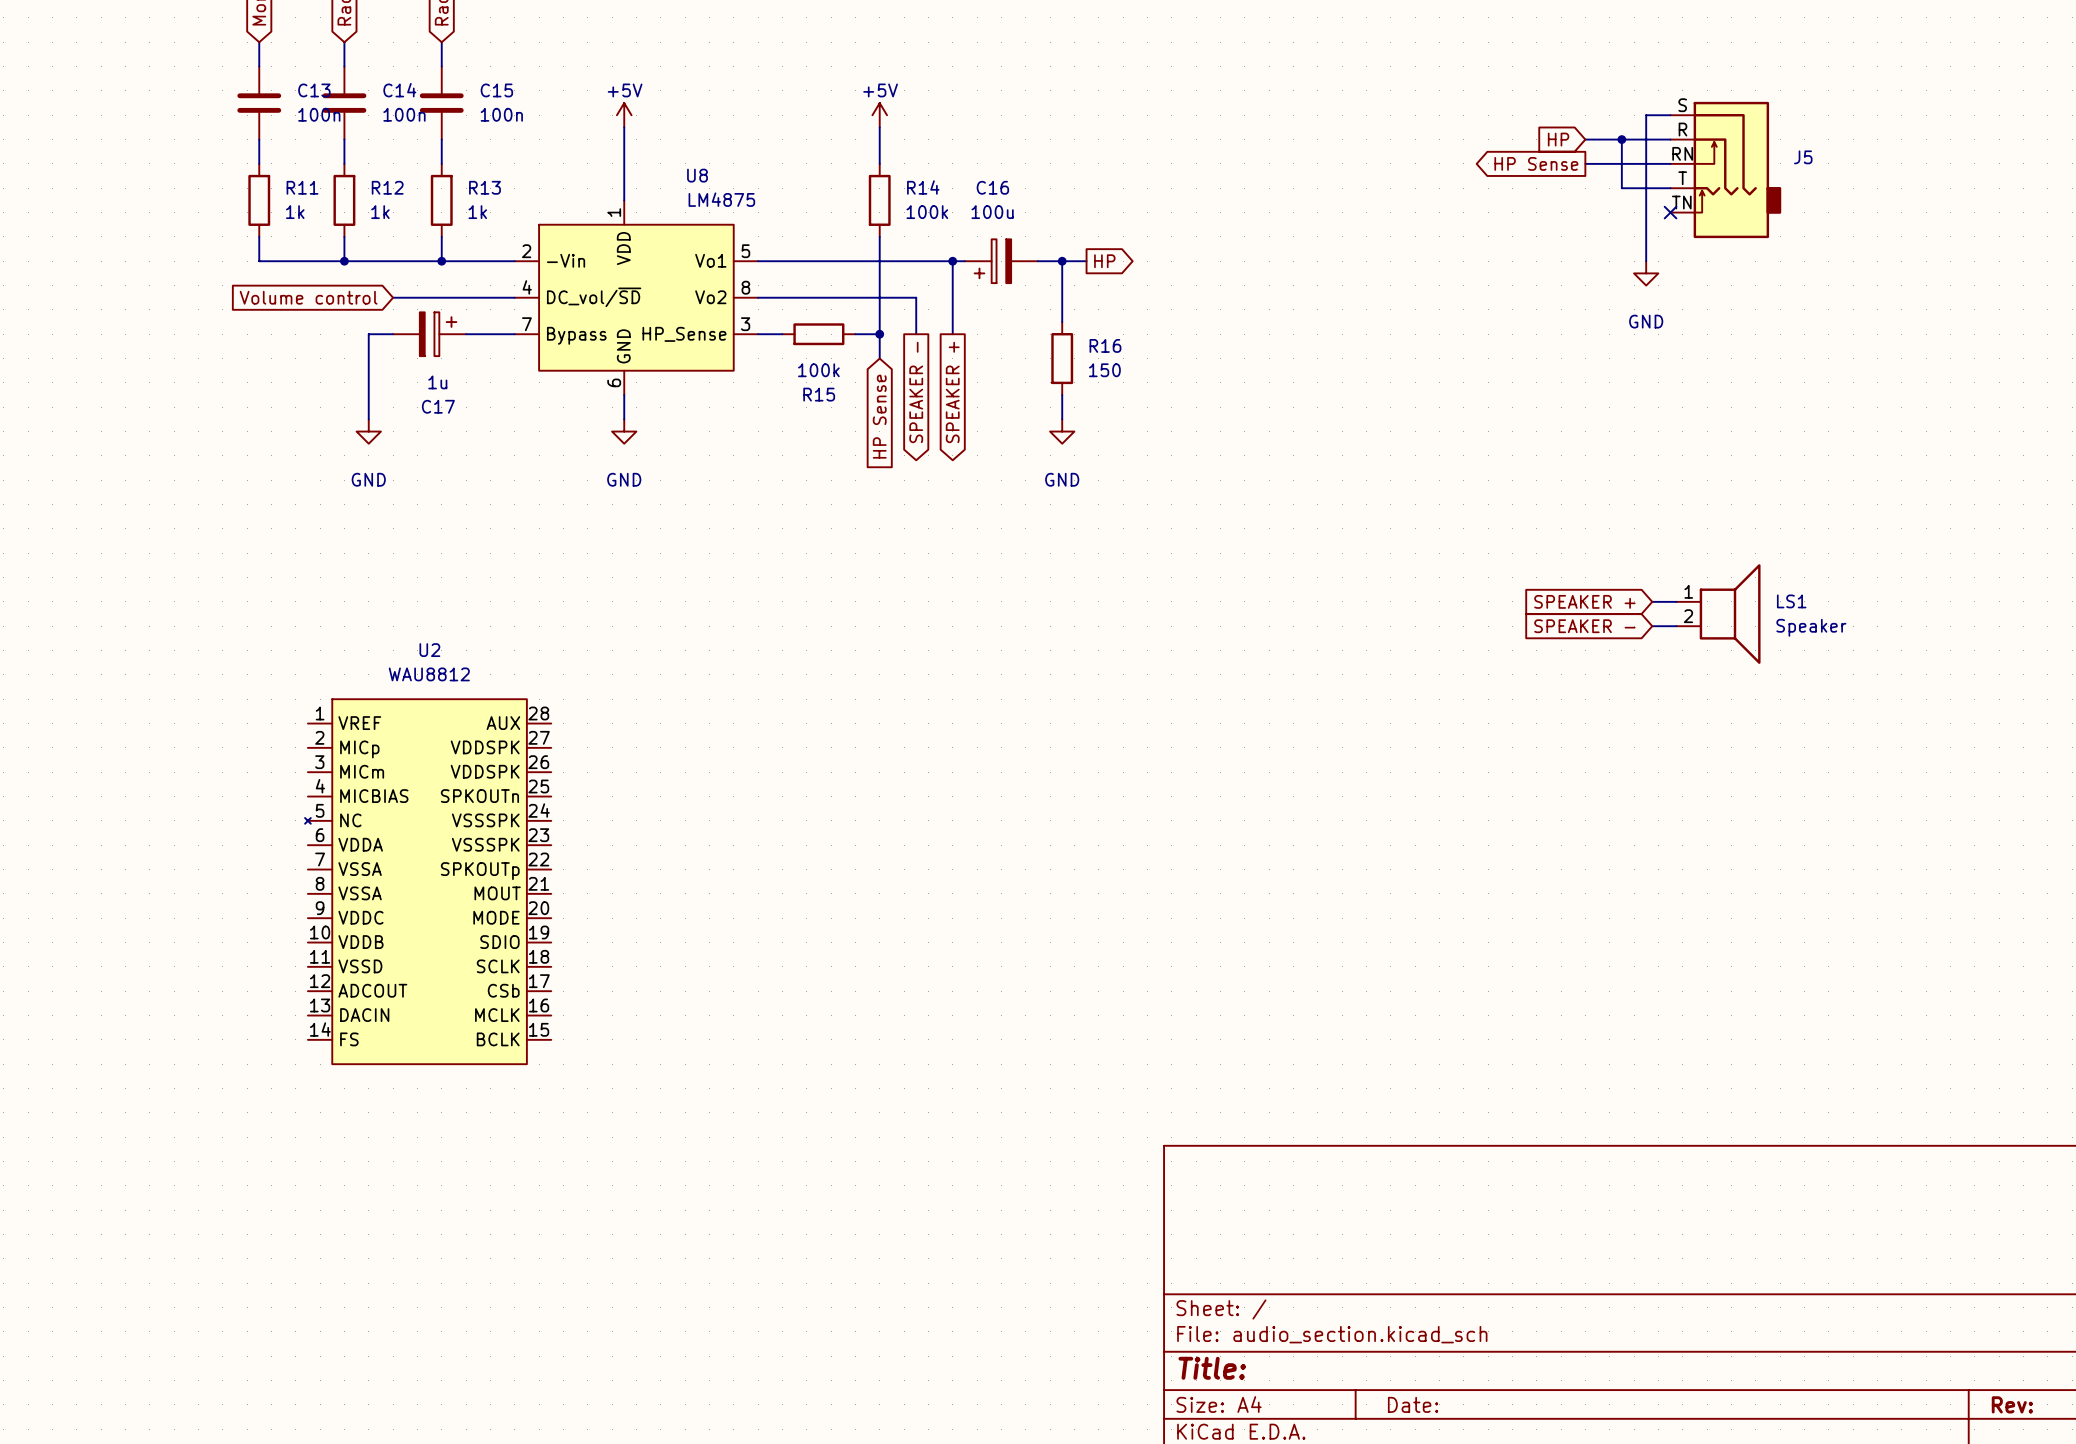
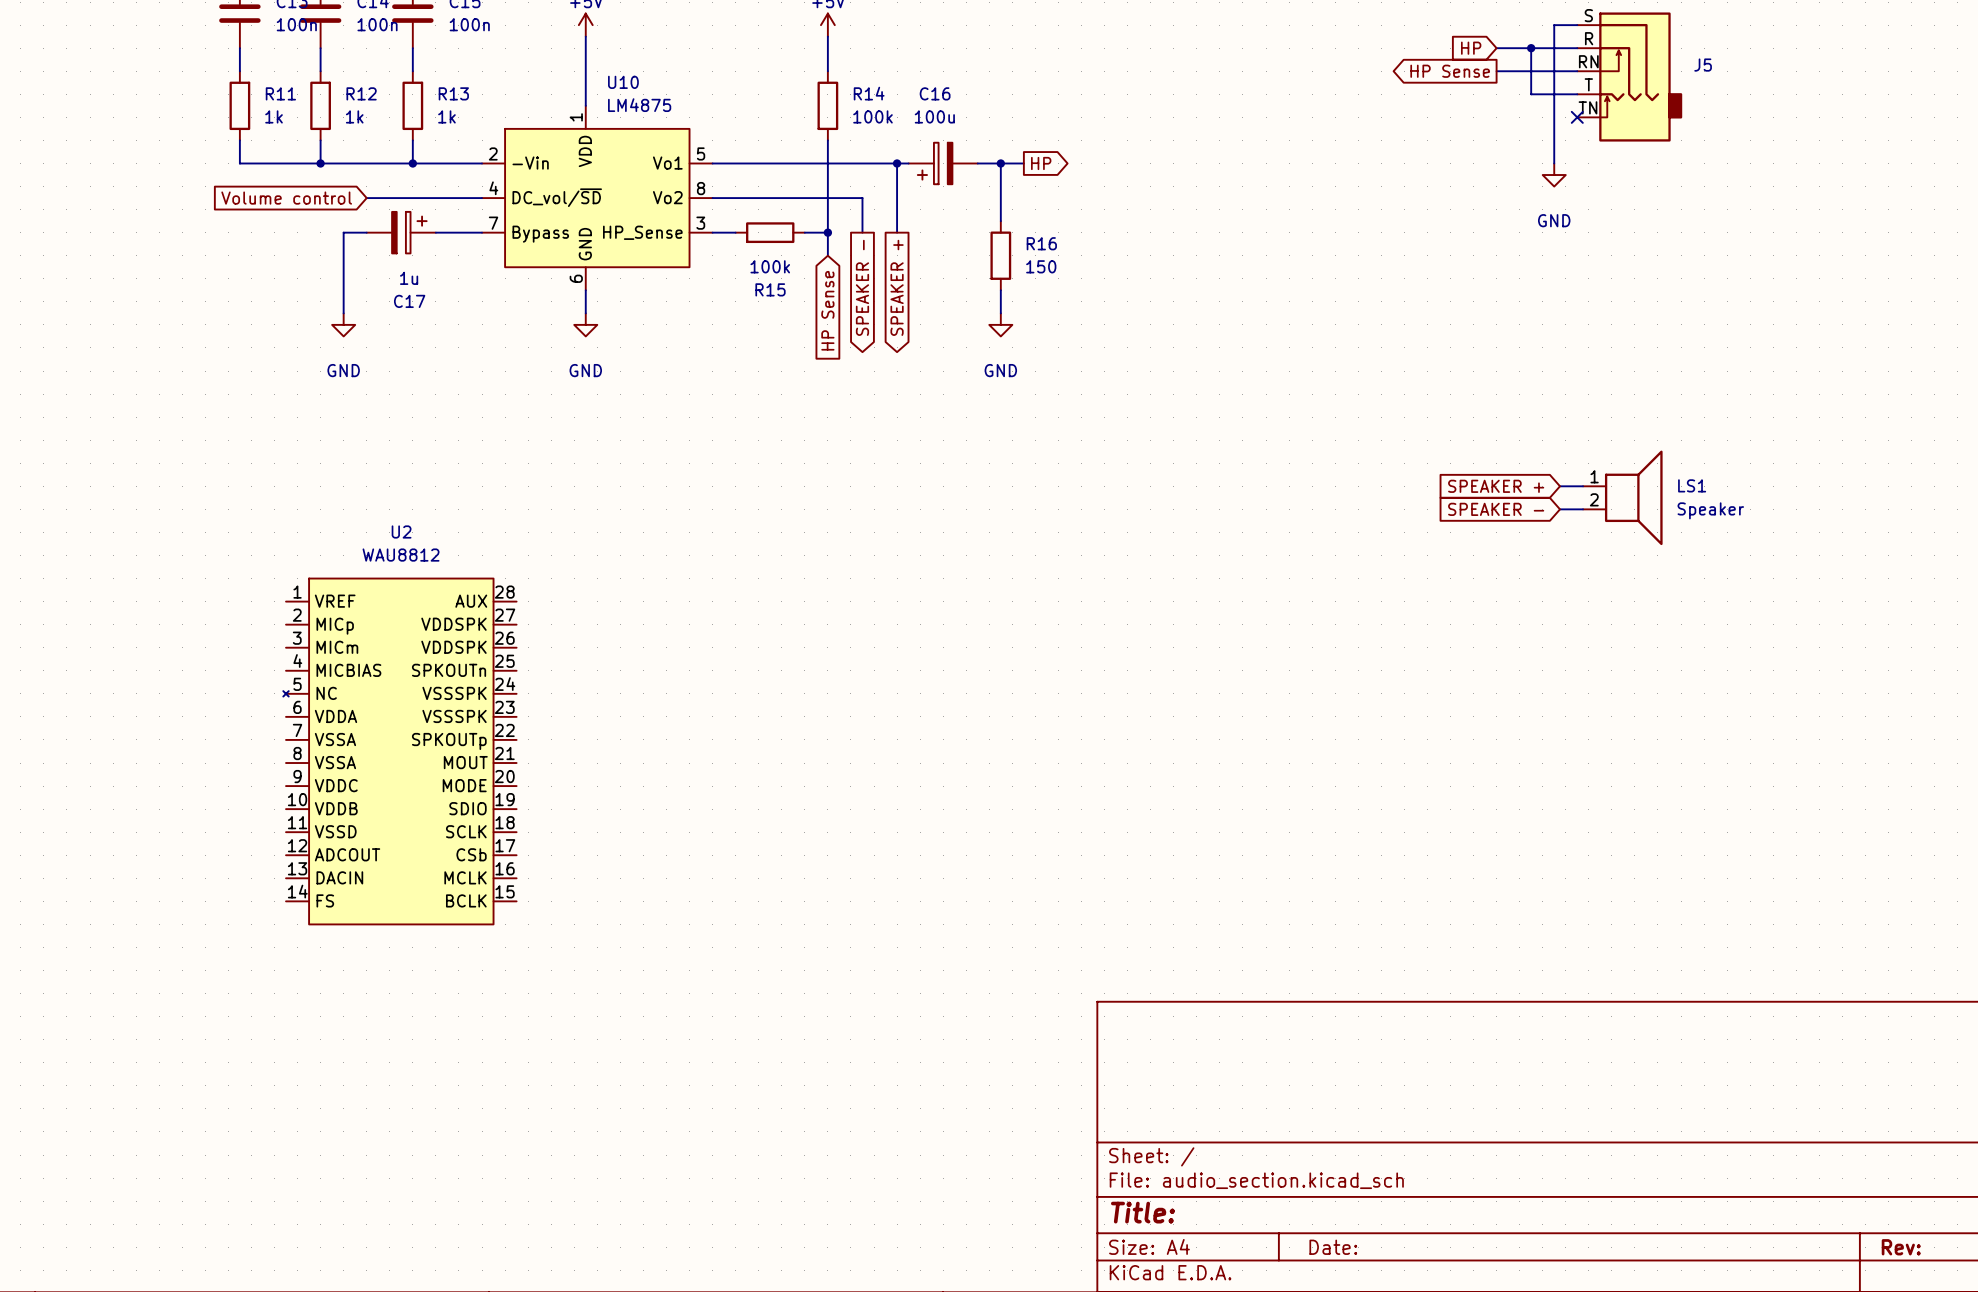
U8 name: U8 (697, 175) -> U10 (623, 82)
U8 value position: LM4875 (721, 199) -> LM4875 (639, 105)

